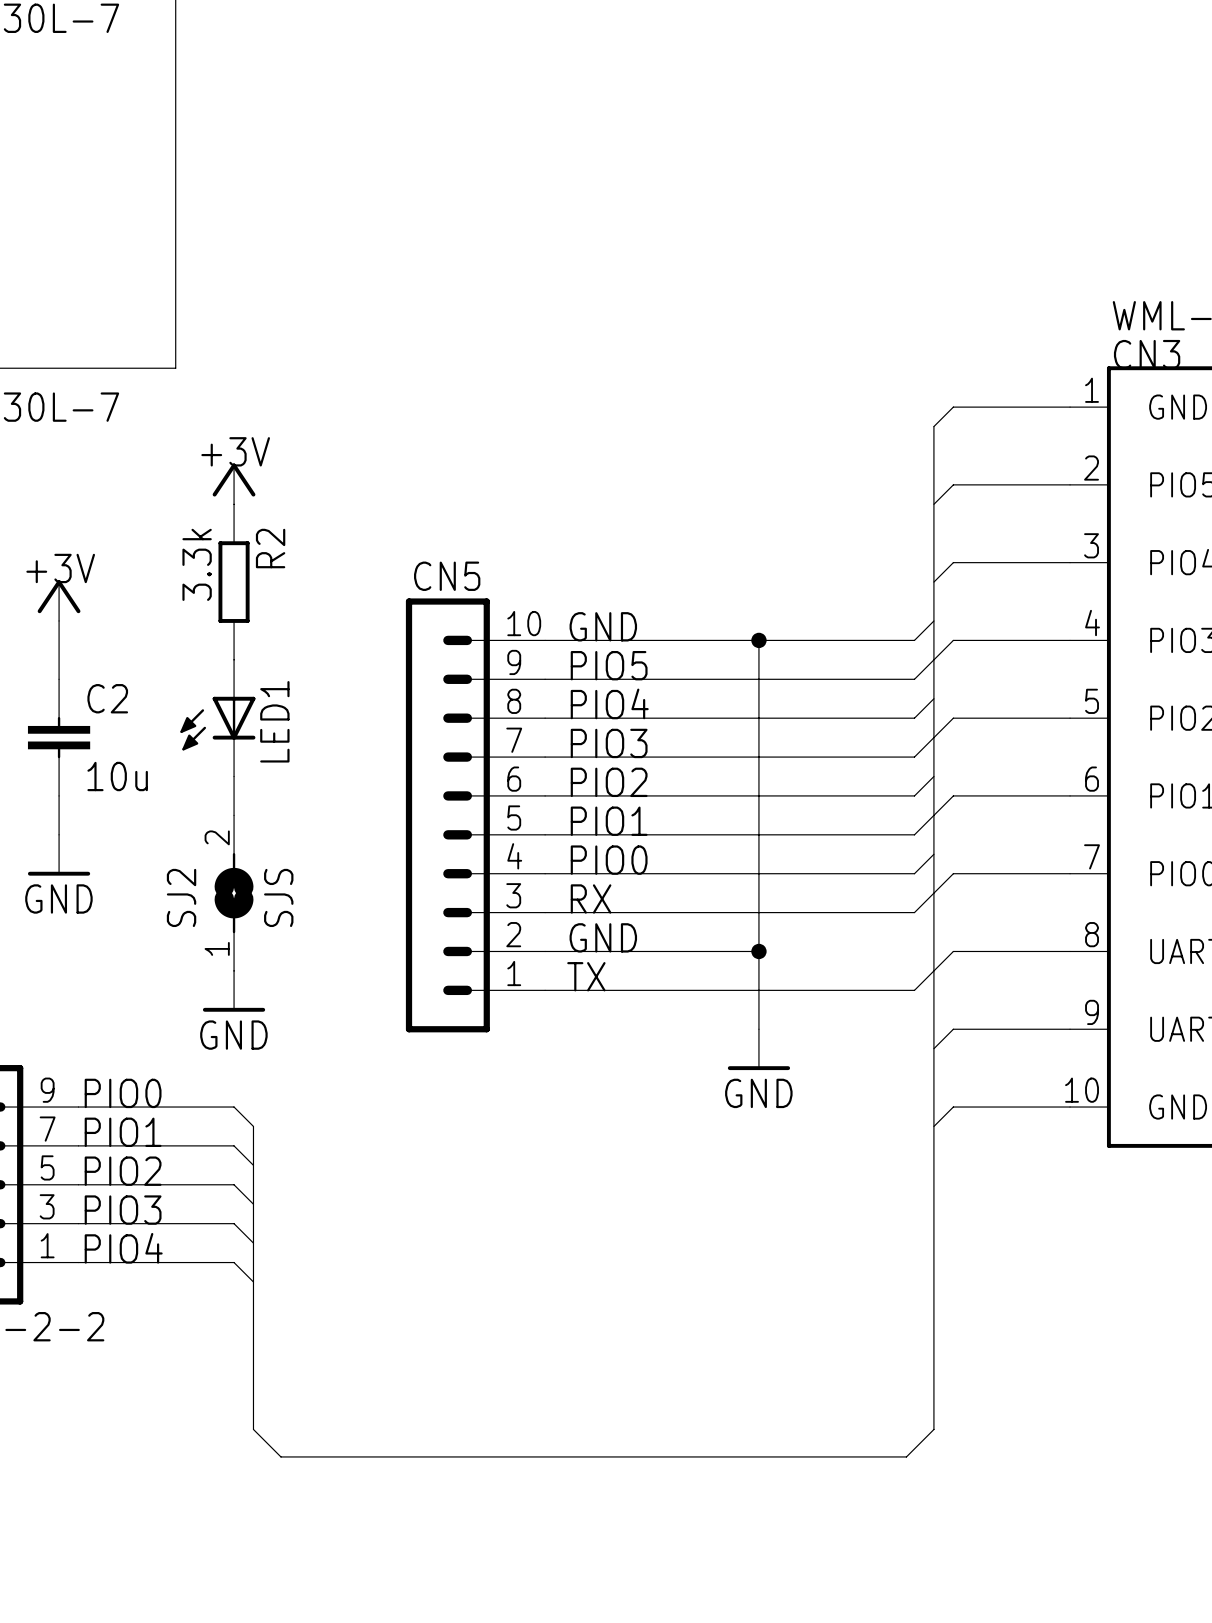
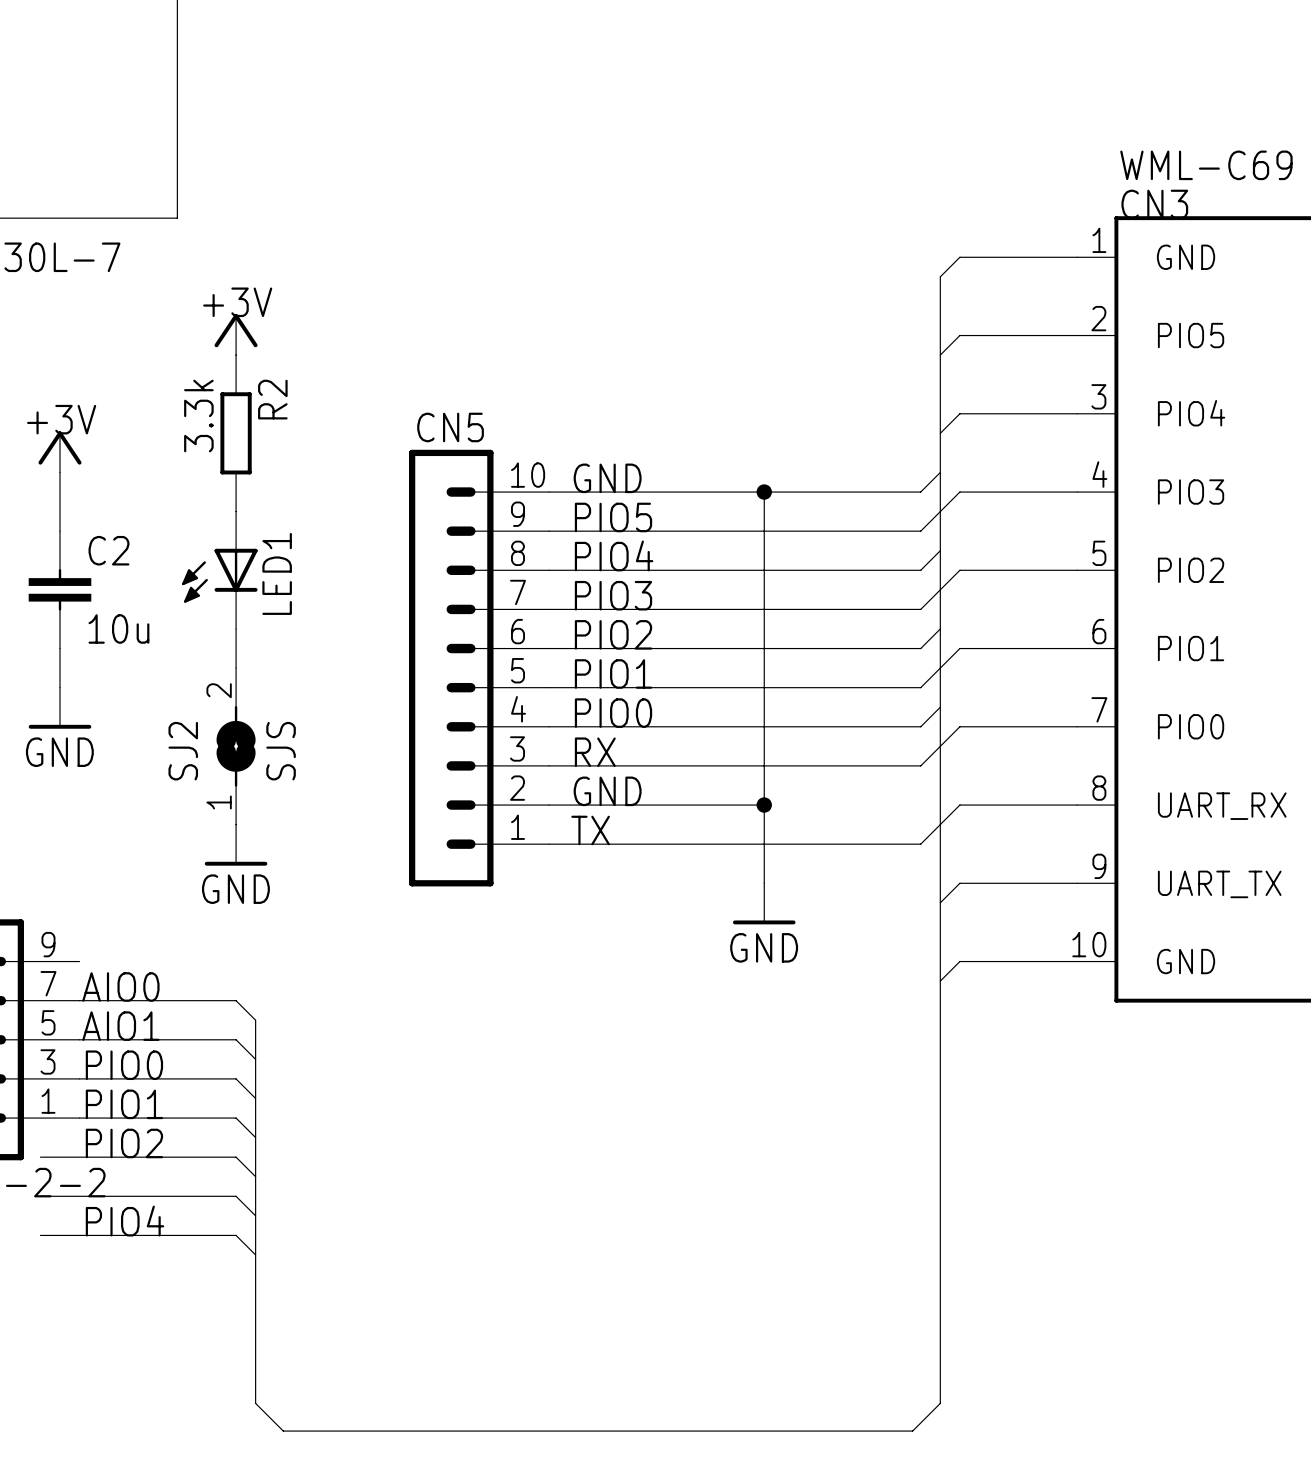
label: PIO0 (123, 1093) -> none
wire: (78, 1107) (234, 1107) (253, 1126) -> none
bus: (253, 1126) (253, 1165) -> none
label: PIO1 (123, 1132) -> AIO0 (120, 986)
label: PIO2 (123, 1171) -> AIO1 (120, 1026)
label: PIO3 (123, 1210) -> PIO0 (124, 1065)
label: PIO4 (123, 1248) -> PIO1 (124, 1104)
label: none -> PIO2 (124, 1143)
wire: none -> (40, 1157) (236, 1157) (255, 1176)
wire: none -> (40, 1196) (236, 1196) (255, 1215)
label: none -> PIO4 (125, 1221)
wire: none -> (40, 1235) (236, 1235) (255, 1254)
bus: (253, 1429) (280, 1456) (906, 1456) (933, 1429) -> (255, 1286) (255, 1403) (283, 1431) (912, 1431) (940, 1403) (940, 1286)

